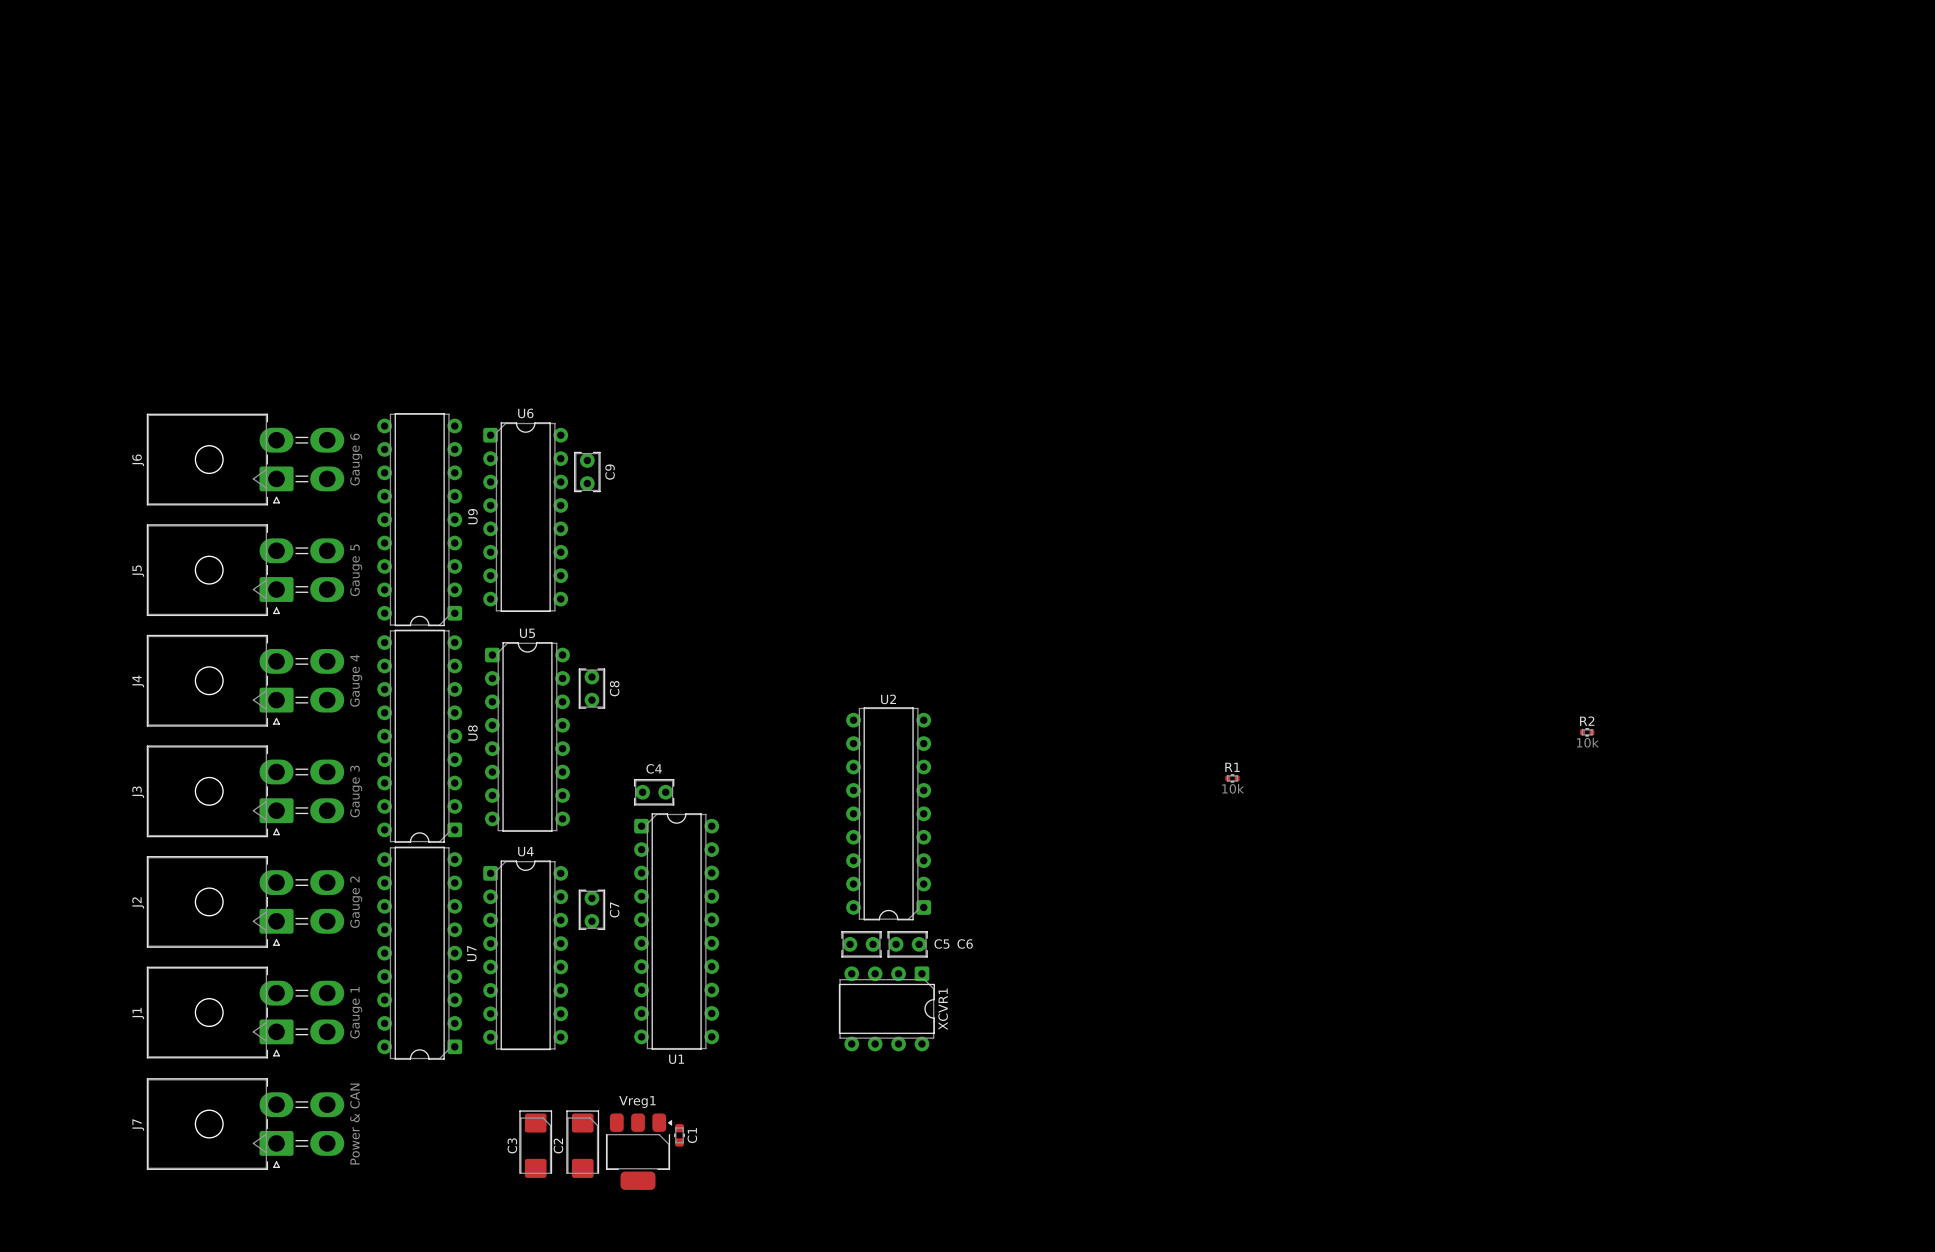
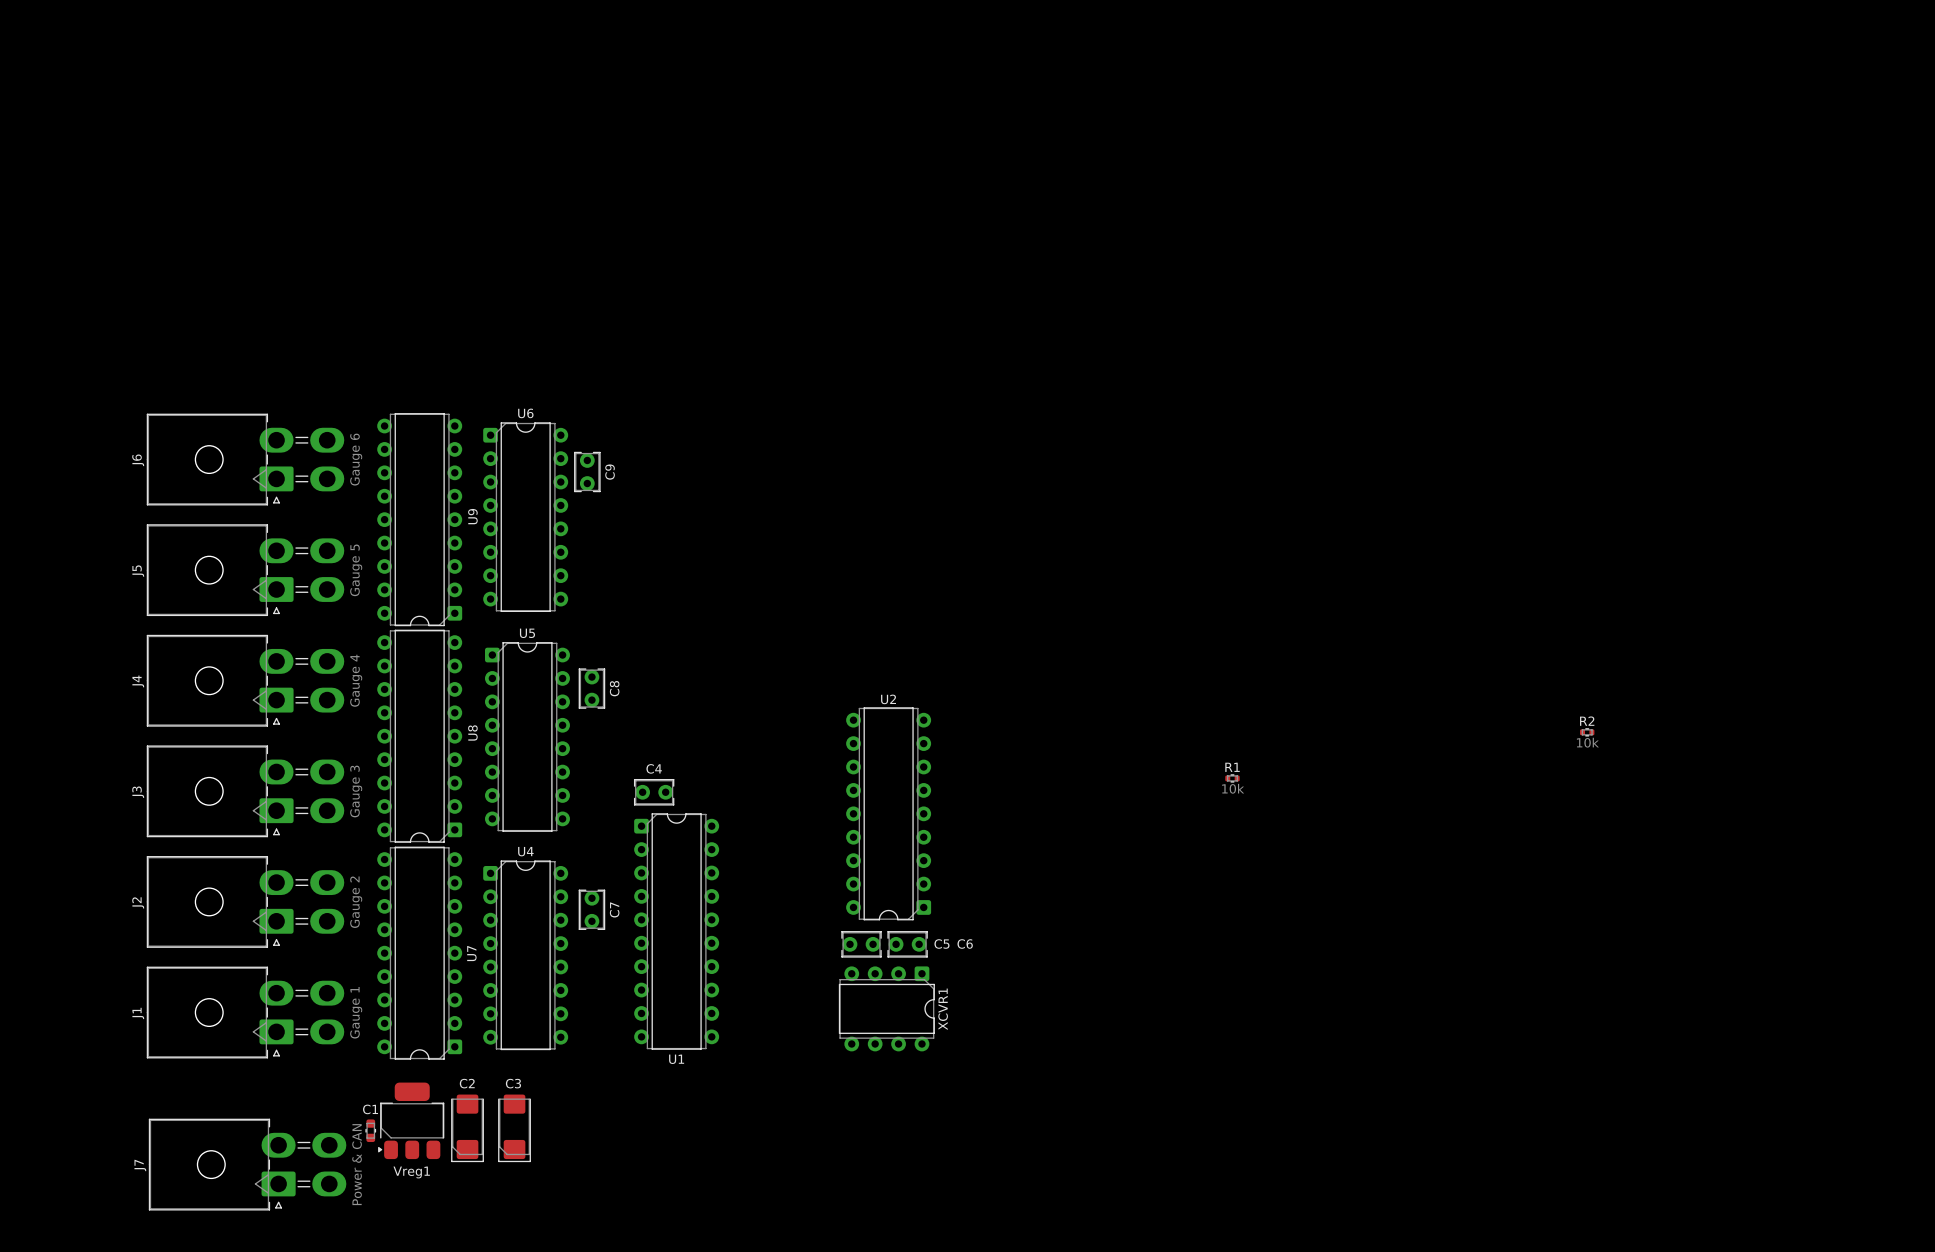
J7 position: (245, 1124) -> (247, 1164)
C1 position: (679, 1135) -> (370, 1130)
C1 name rotation: 0° (692, 1135) -> 90° clockwise (370, 1109)
C1 name position: C1 (692, 1135) -> C1 (370, 1109)
C3 rotation: 0° (535, 1144) -> 180° (514, 1128)
C2 rotation: 0° (582, 1144) -> 180° (467, 1128)
C2 position: (582, 1144) -> (467, 1128)
C3 name position: C3 (512, 1145) -> C3 (513, 1083)
C2 name position: C2 (558, 1145) -> C2 (467, 1083)
Vreg1 rotation: 0° (639, 1151) -> 180° (411, 1120)
Vreg1 position: (639, 1151) -> (411, 1120)

